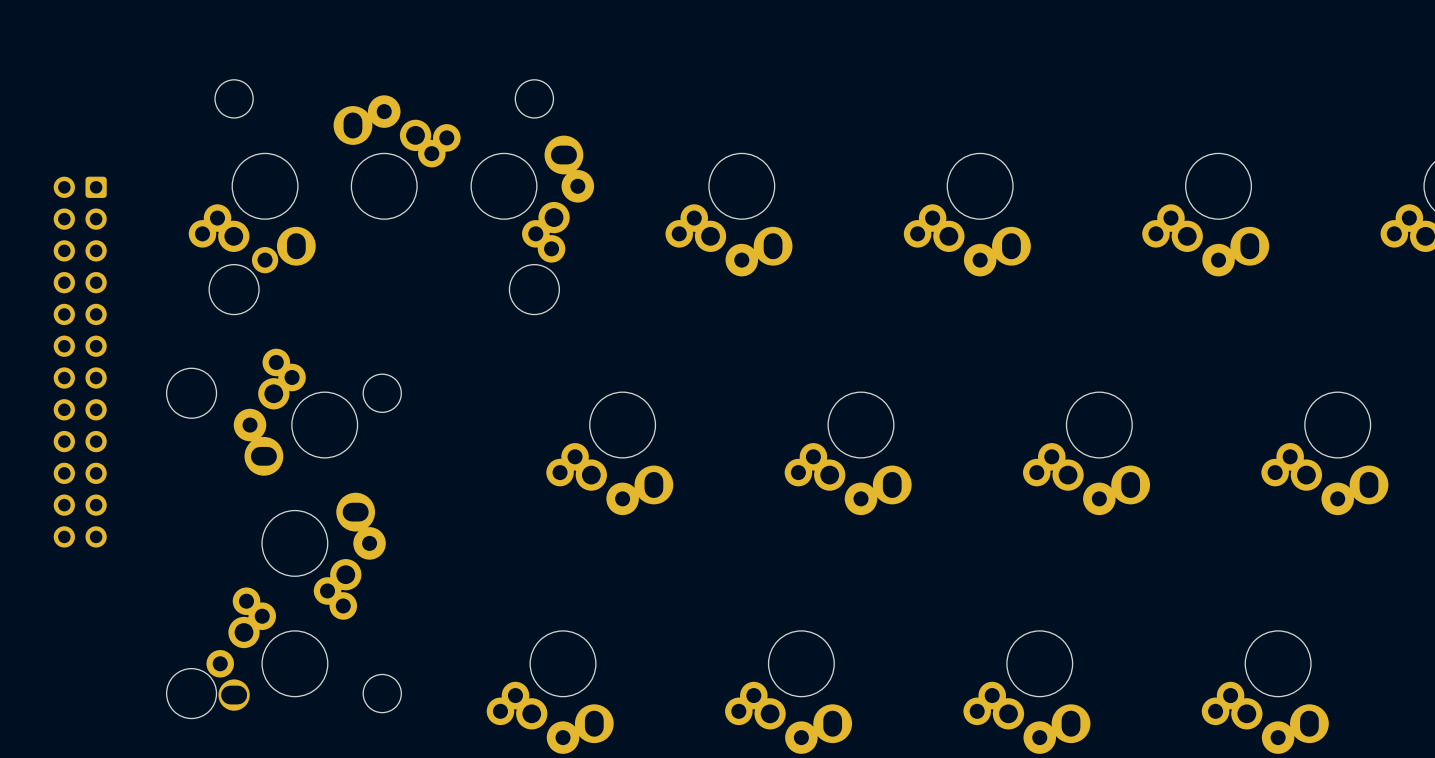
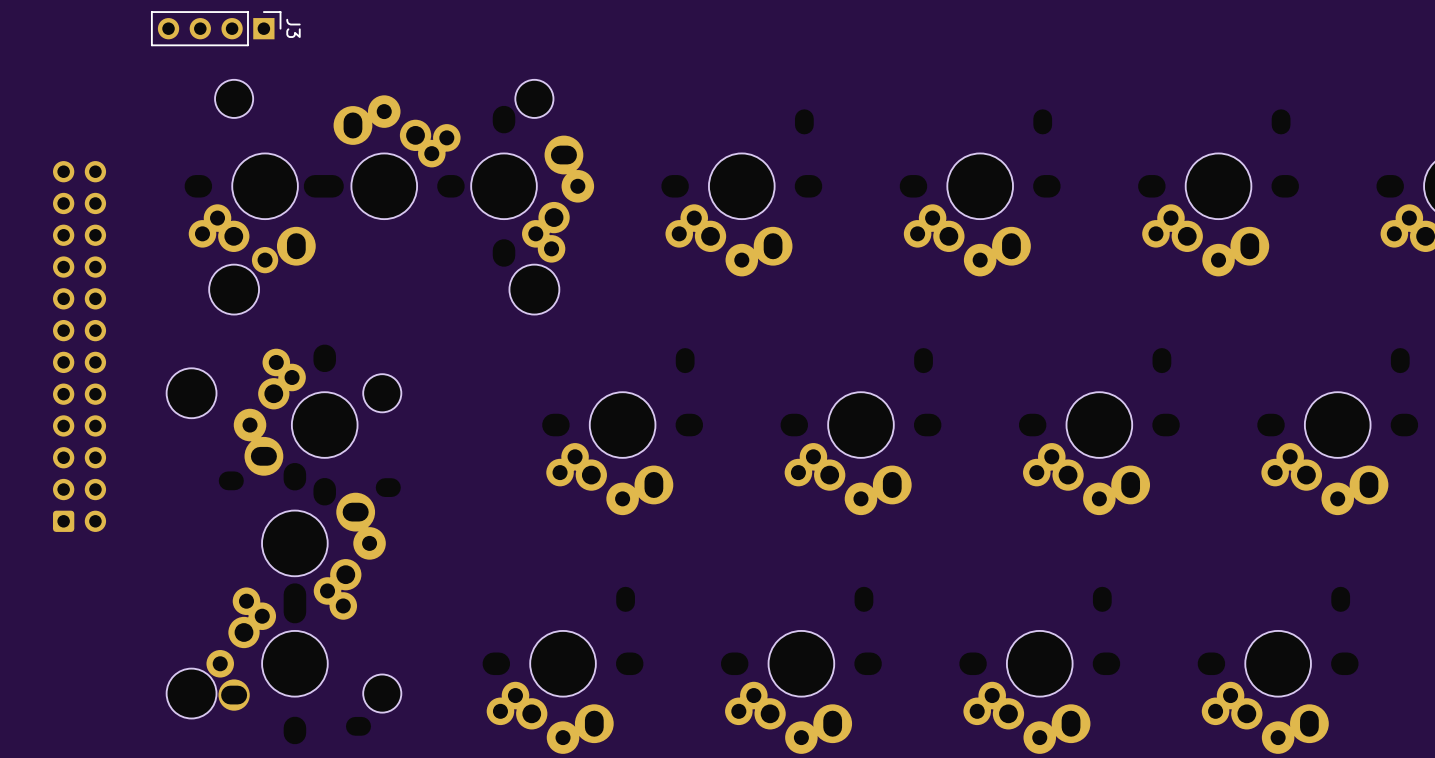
J3: none -> (216, 28)
part rotation: 0° (80, 362) -> 180° (79, 346)

